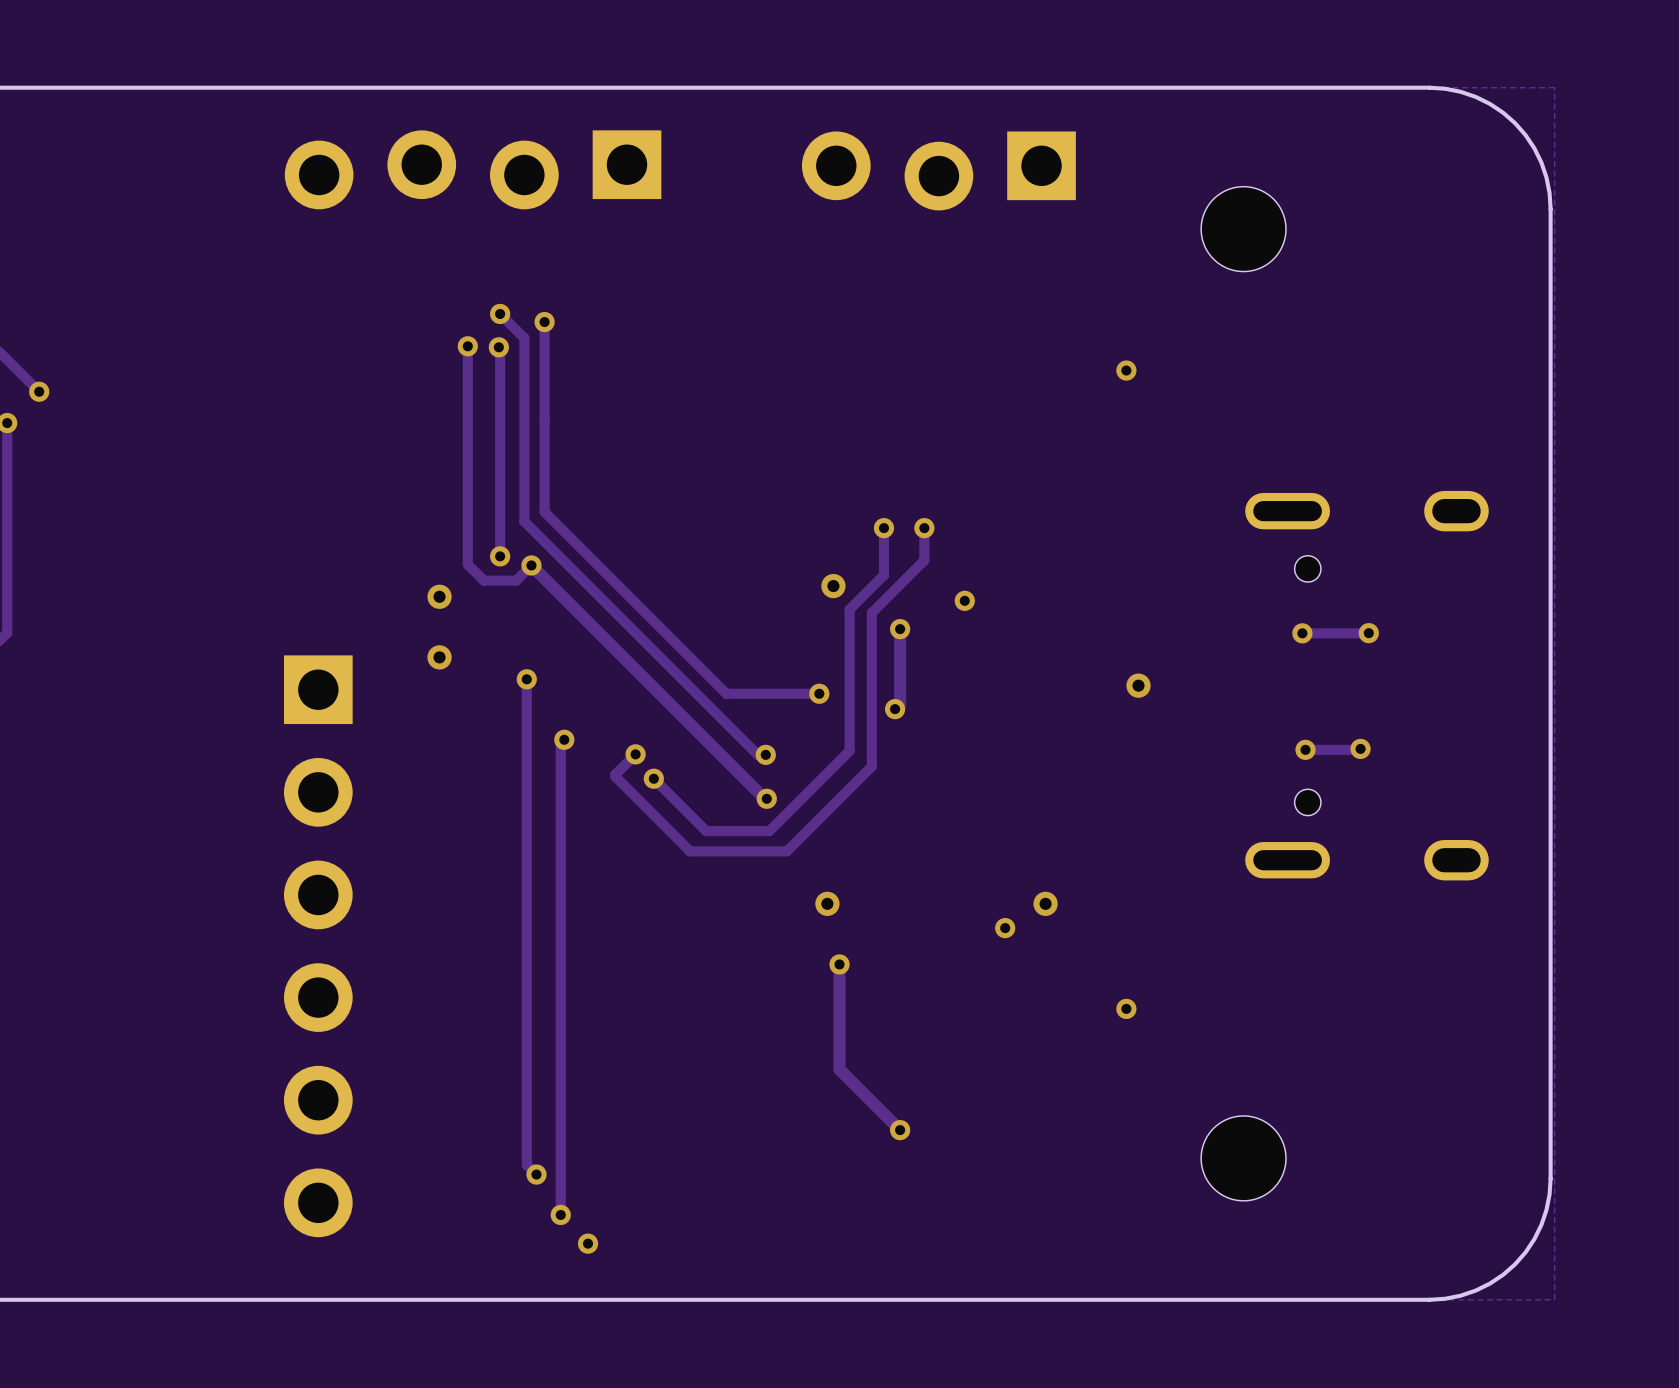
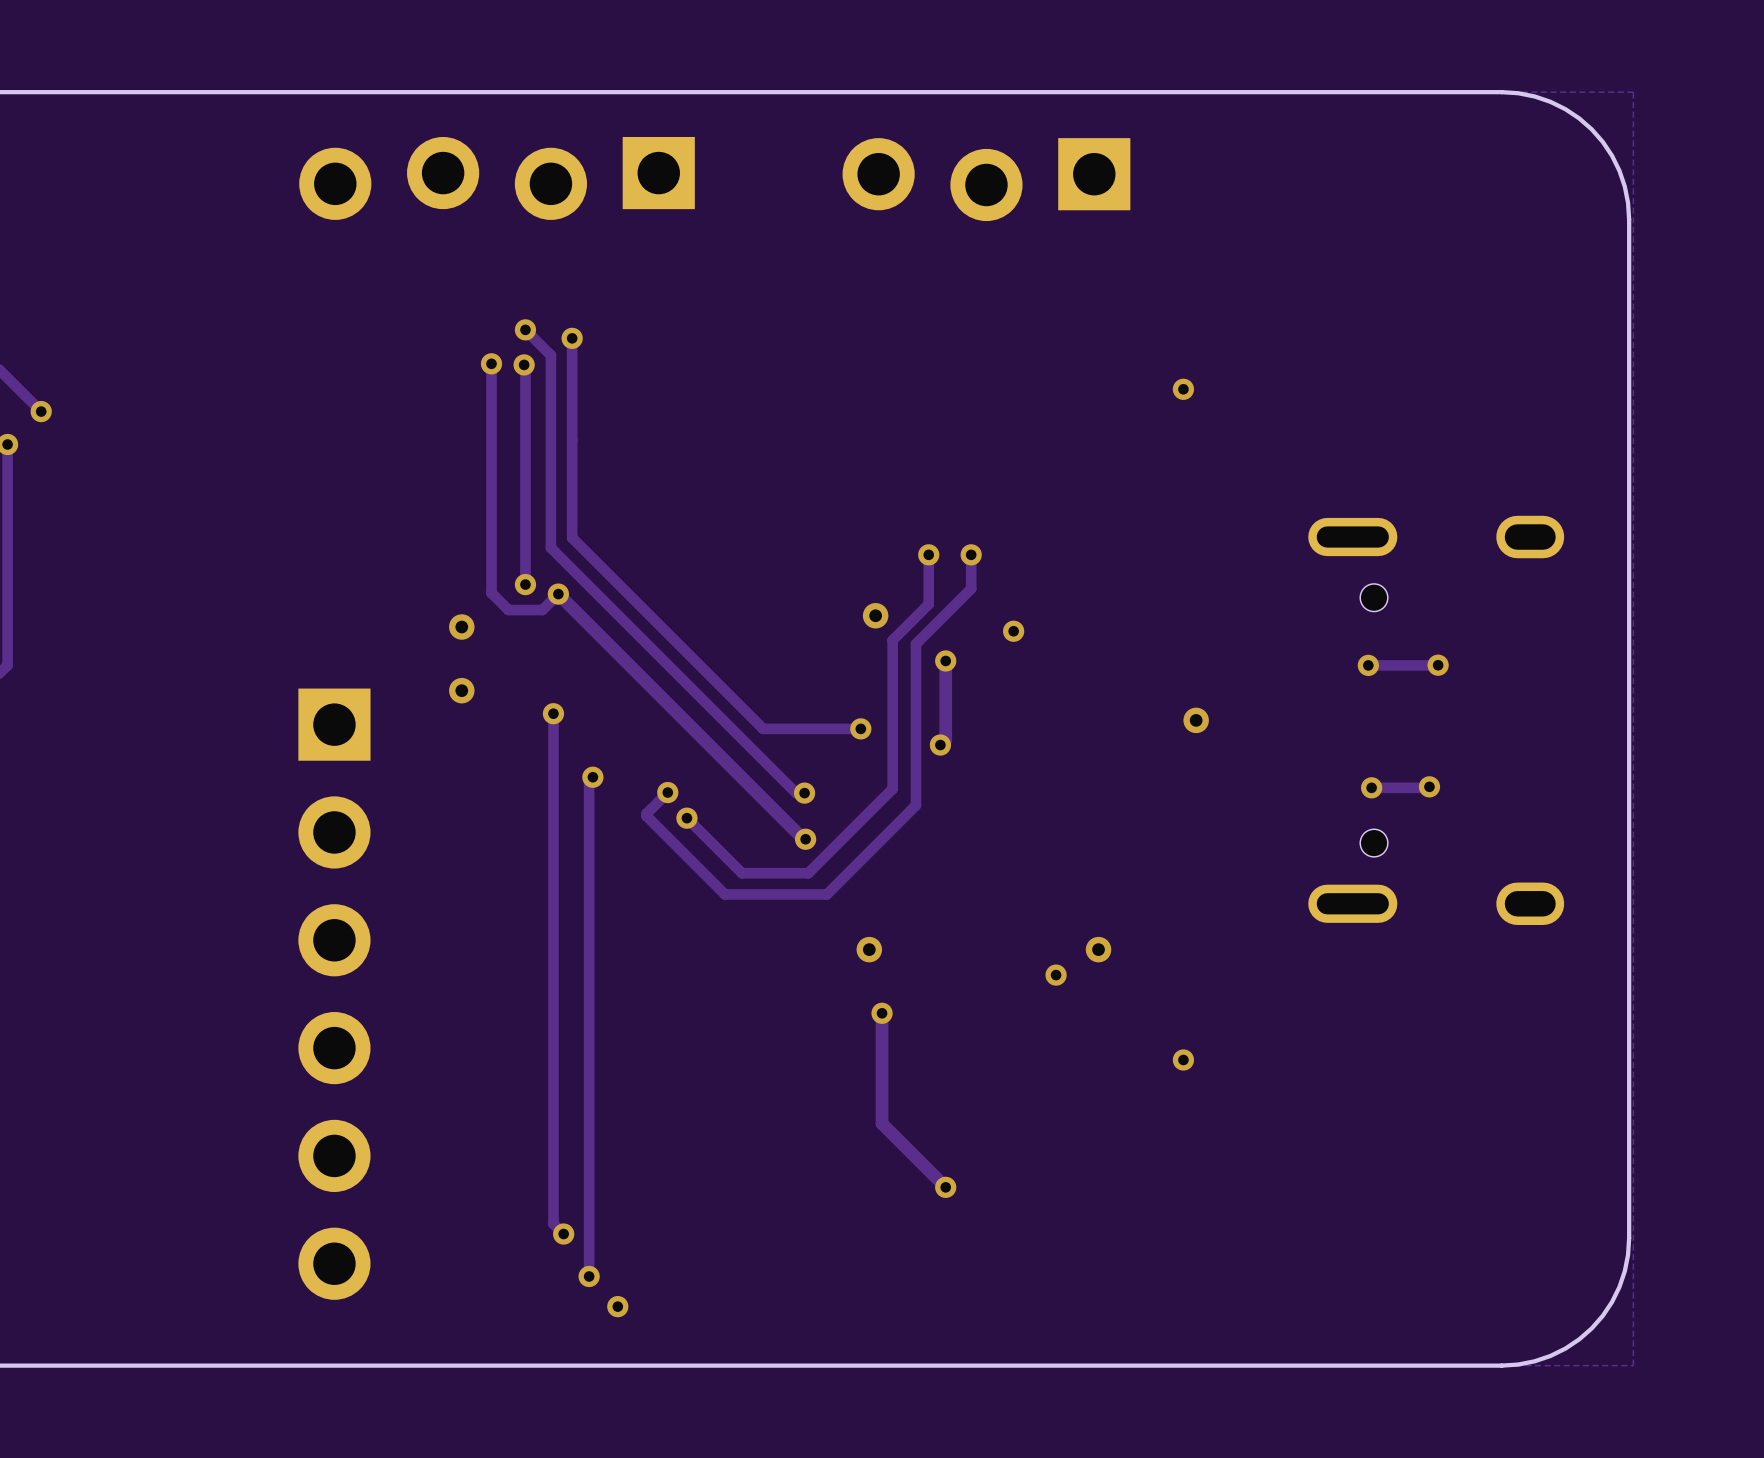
part: (1243, 229) -> none
part: (1243, 1158) -> none

